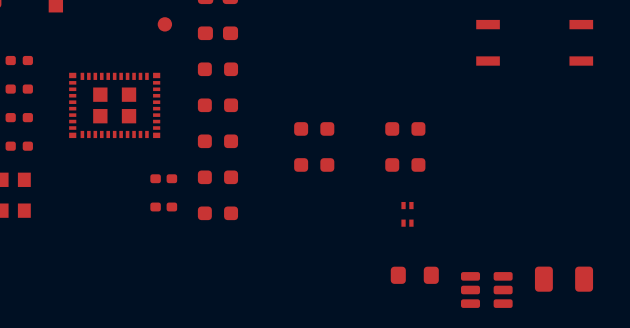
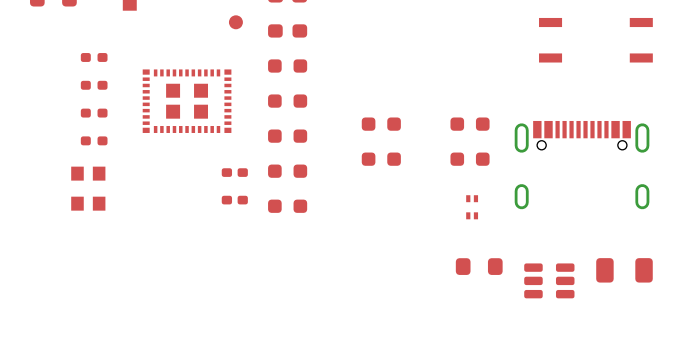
part: none -> (582, 165)

